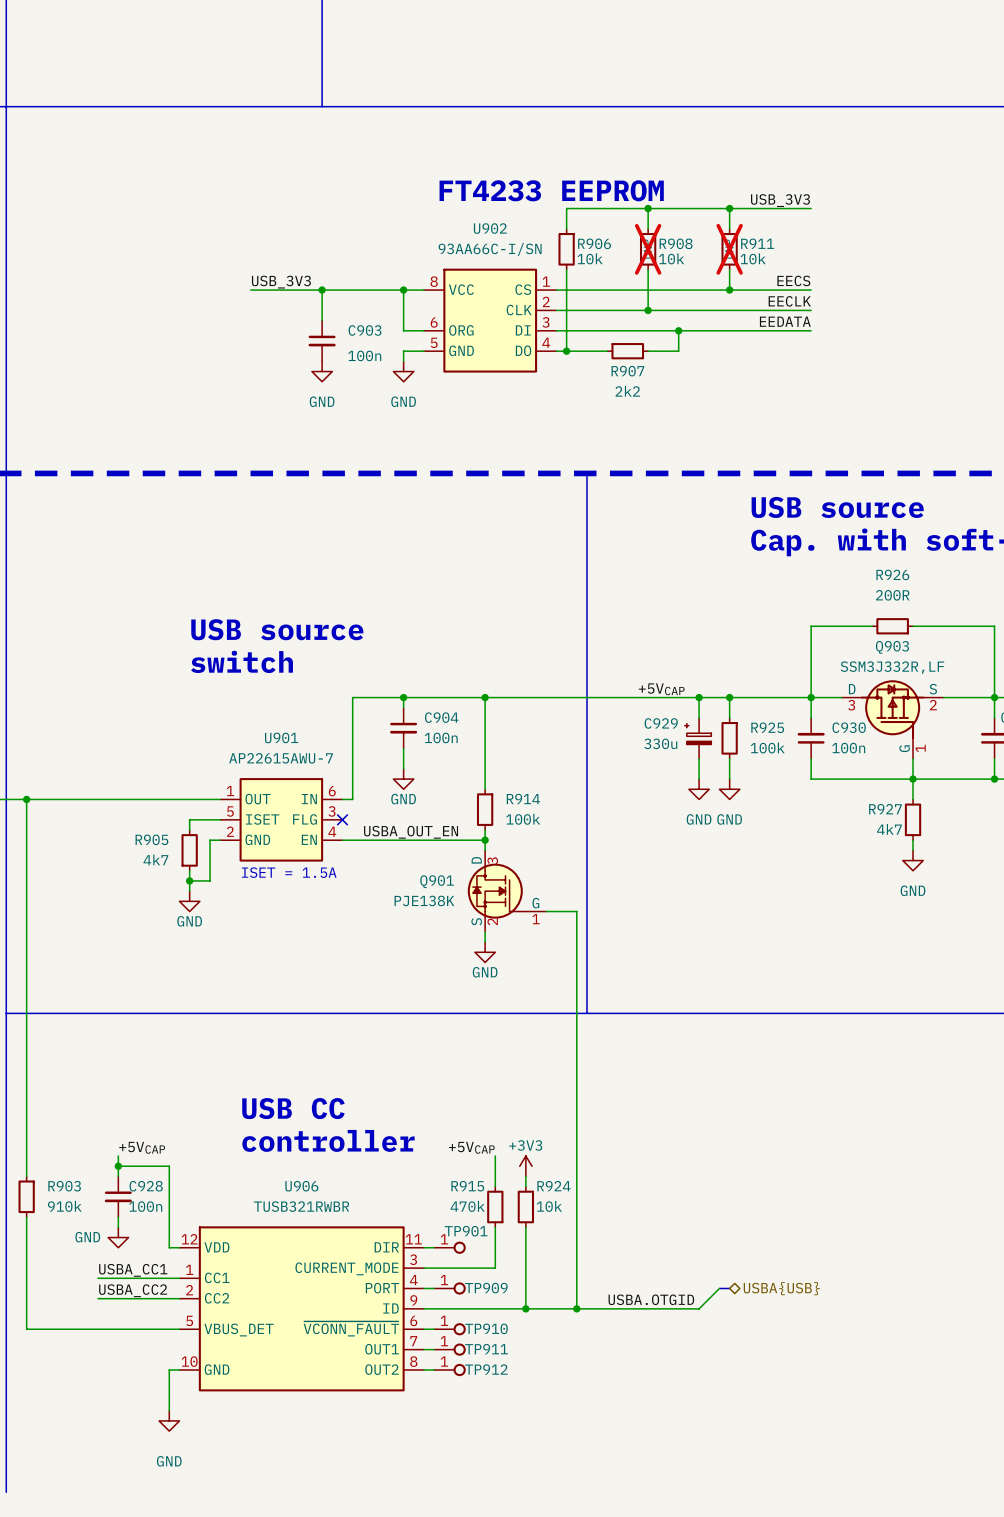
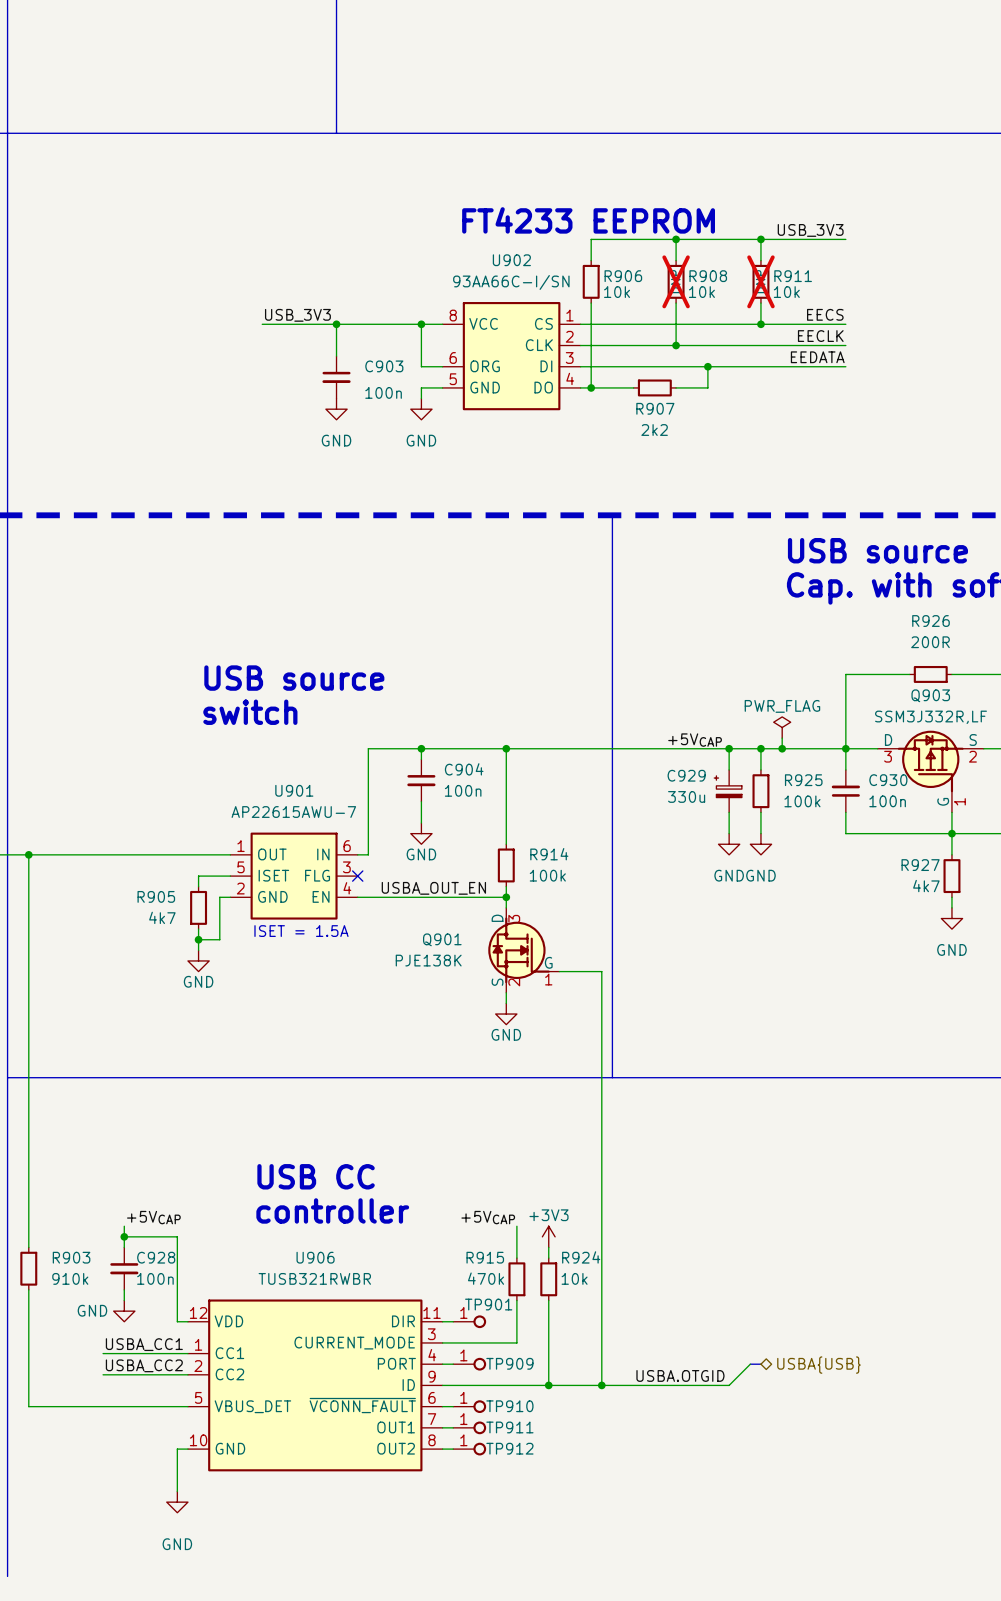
power symbol: none -> PWR_FLAG (782, 727)
wire: none -> (782, 738) (782, 748)
junction: none -> (782, 748)
Q901 symbol: [467, 850, 547, 932] -> [488, 907, 560, 993]

